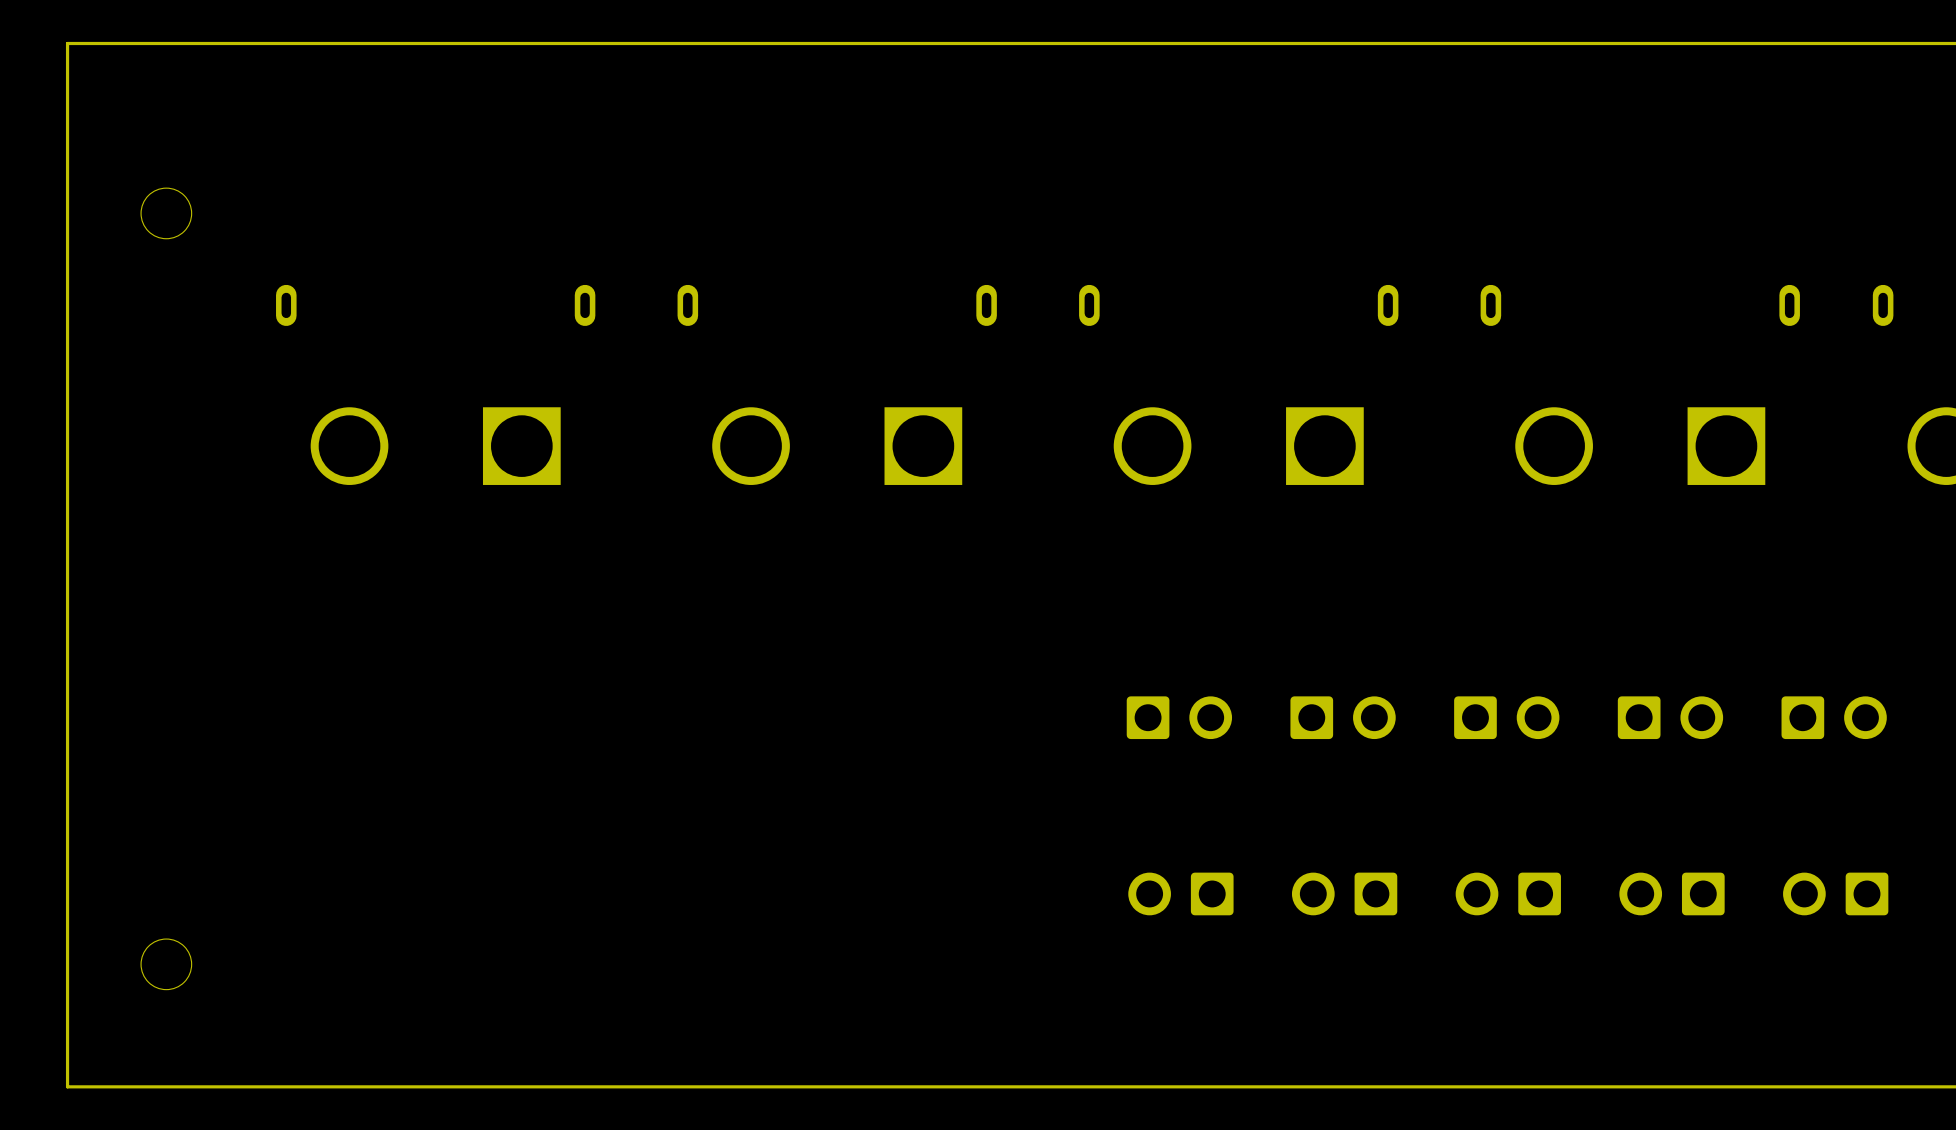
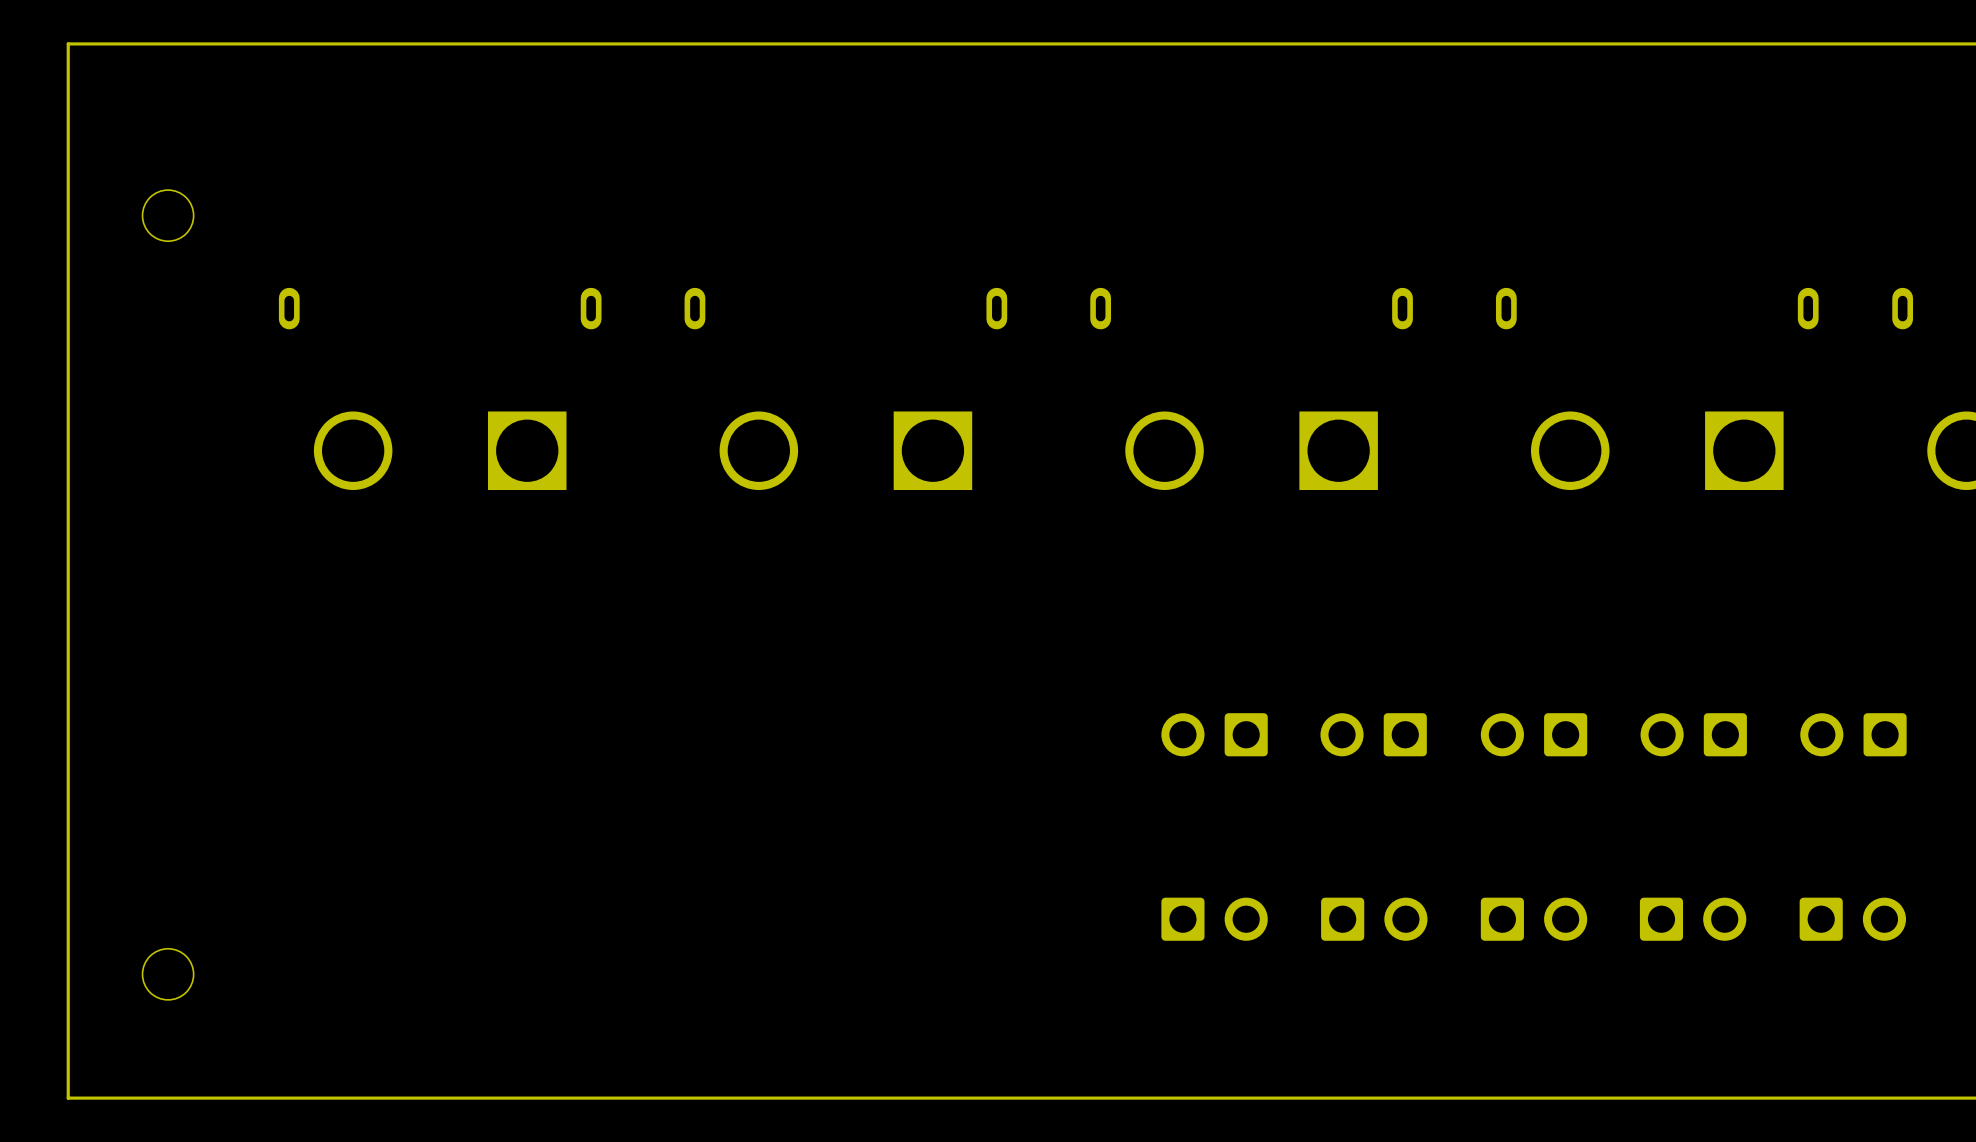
part rotation: 0° (1179, 717) -> 180° (1214, 734)
part rotation: 0° (1343, 717) -> 180° (1373, 734)
part rotation: 0° (1506, 717) -> 180° (1534, 734)
part rotation: 0° (1670, 717) -> 180° (1693, 734)
part rotation: 0° (1834, 717) -> 180° (1853, 734)
part rotation: 0° (1180, 893) -> 180° (1214, 919)
part rotation: 0° (1344, 893) -> 180° (1374, 919)
part rotation: 0° (1508, 893) -> 180° (1534, 919)
part rotation: 0° (1672, 893) -> 180° (1693, 919)
part rotation: 0° (1835, 893) -> 180° (1852, 919)

